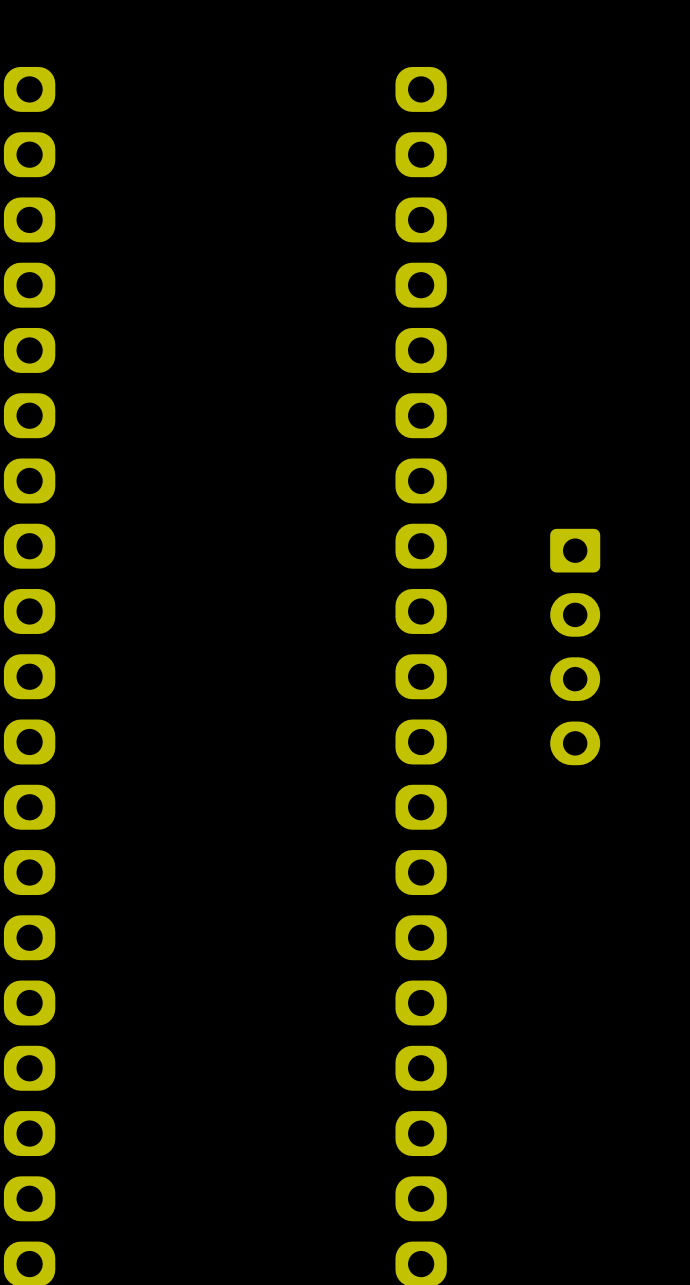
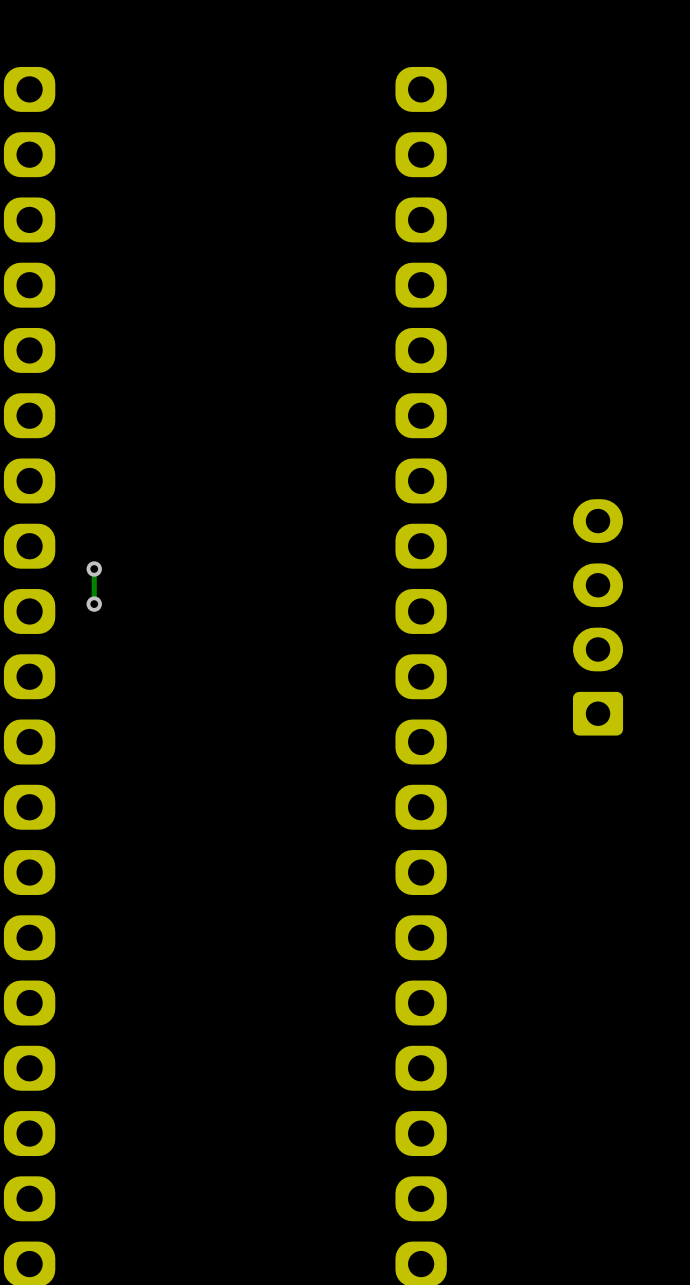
track: none -> (94, 569) (94, 604)
via: none -> (94, 569)
via: none -> (94, 604)
part rotation: 0° (575, 647) -> 180° (598, 617)

